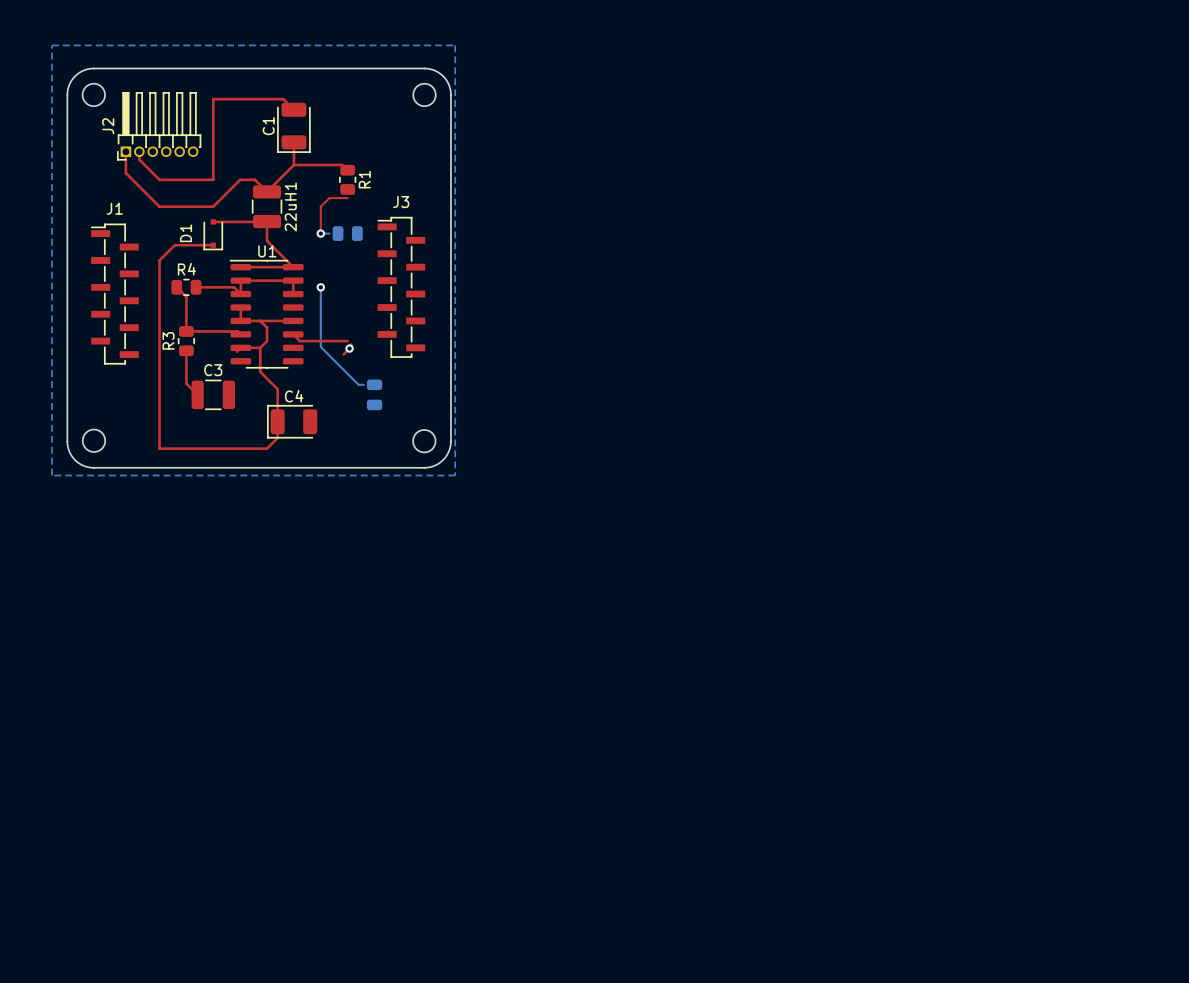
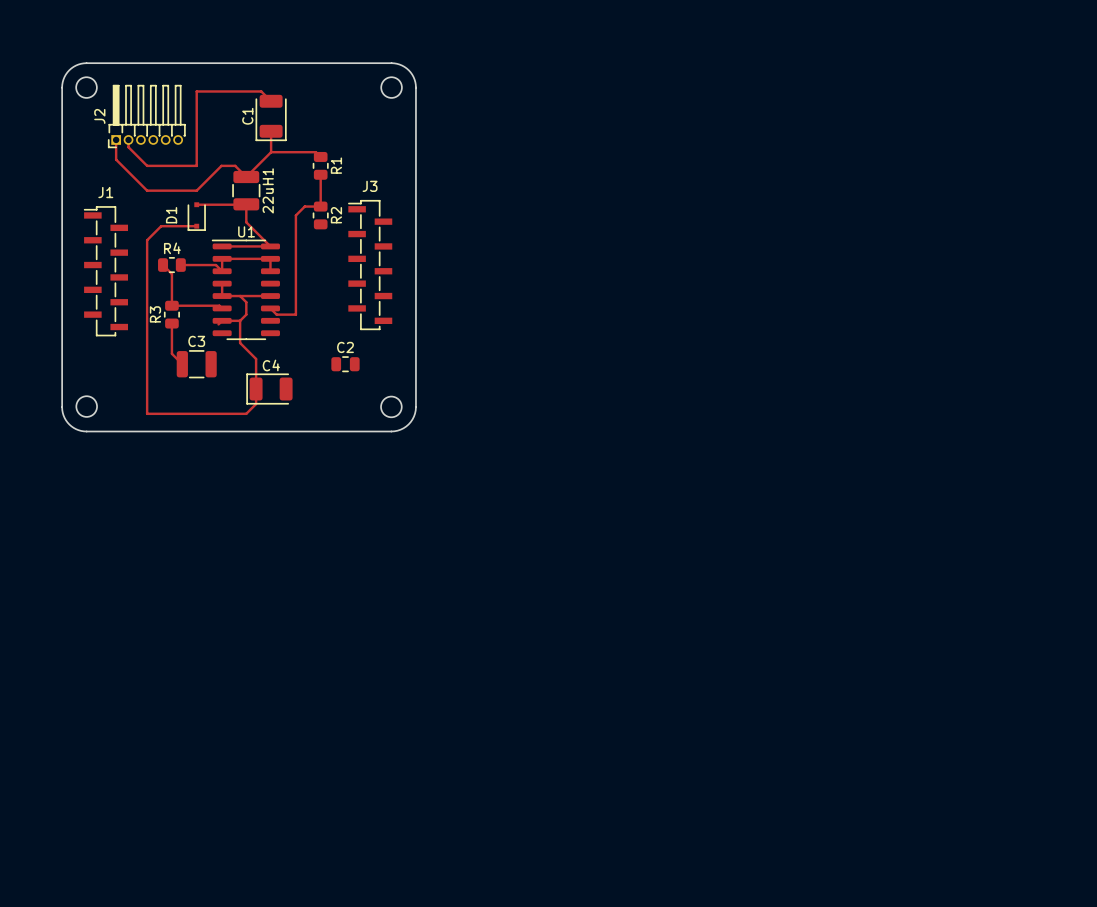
bottom zone outline: (51, 45) (51, 475) (455, 475) (455, 45) (51, 45) -> none
top track: (347, 198) (329, 198) (320, 206) (320, 233) -> none
bottom track: (320, 233) (329, 233) -> none
via: (320, 233) -> none
R2 side: bottom (347, 233) -> top (320, 215)
bottom track: (320, 287) (320, 346) (358, 384) (363, 384) -> none
via: (320, 287) -> none
top track: (320, 341) (347, 341) -> (295, 314) (295, 215) (304, 206) (320, 206) (320, 174)
top track: (351, 344) (351, 347) (343, 354) -> none
via: (349, 348) -> none
C2 side: bottom (374, 394) -> top (345, 364)

